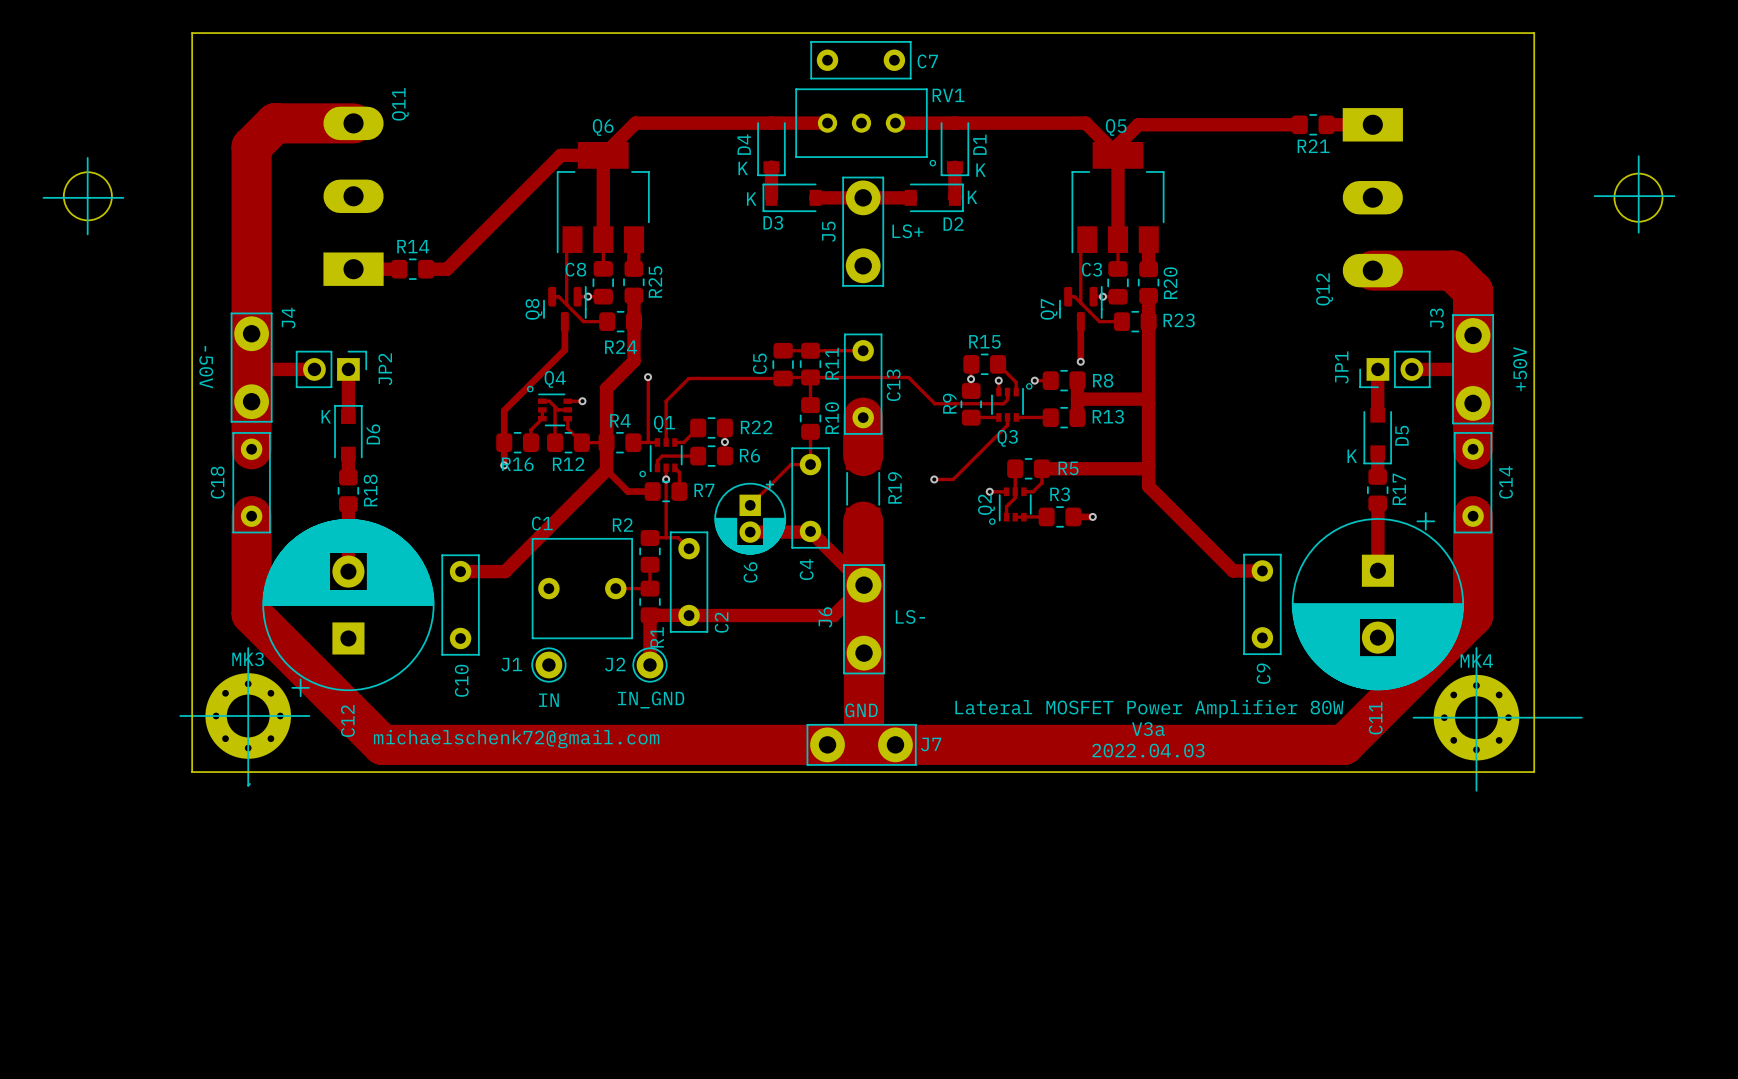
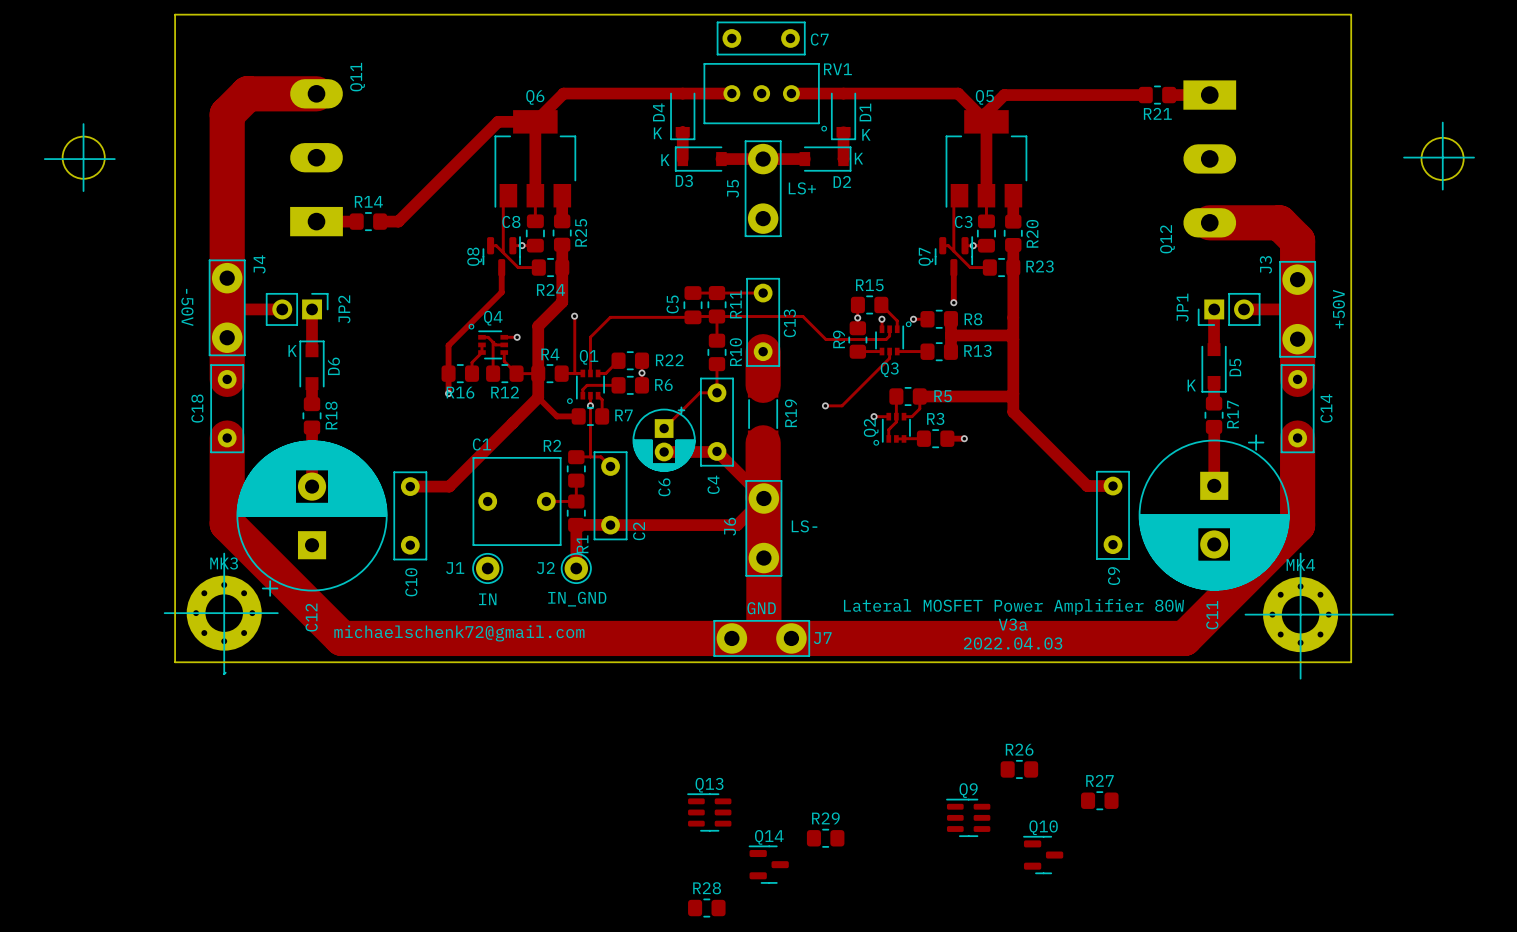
R26: none -> (1019, 769)
R27: none -> (1099, 800)
Q13: none -> (709, 812)
Q9: none -> (968, 817)
R29: none -> (825, 838)
Q10: none -> (1043, 855)
Q14: none -> (768, 864)
R28: none -> (706, 908)

